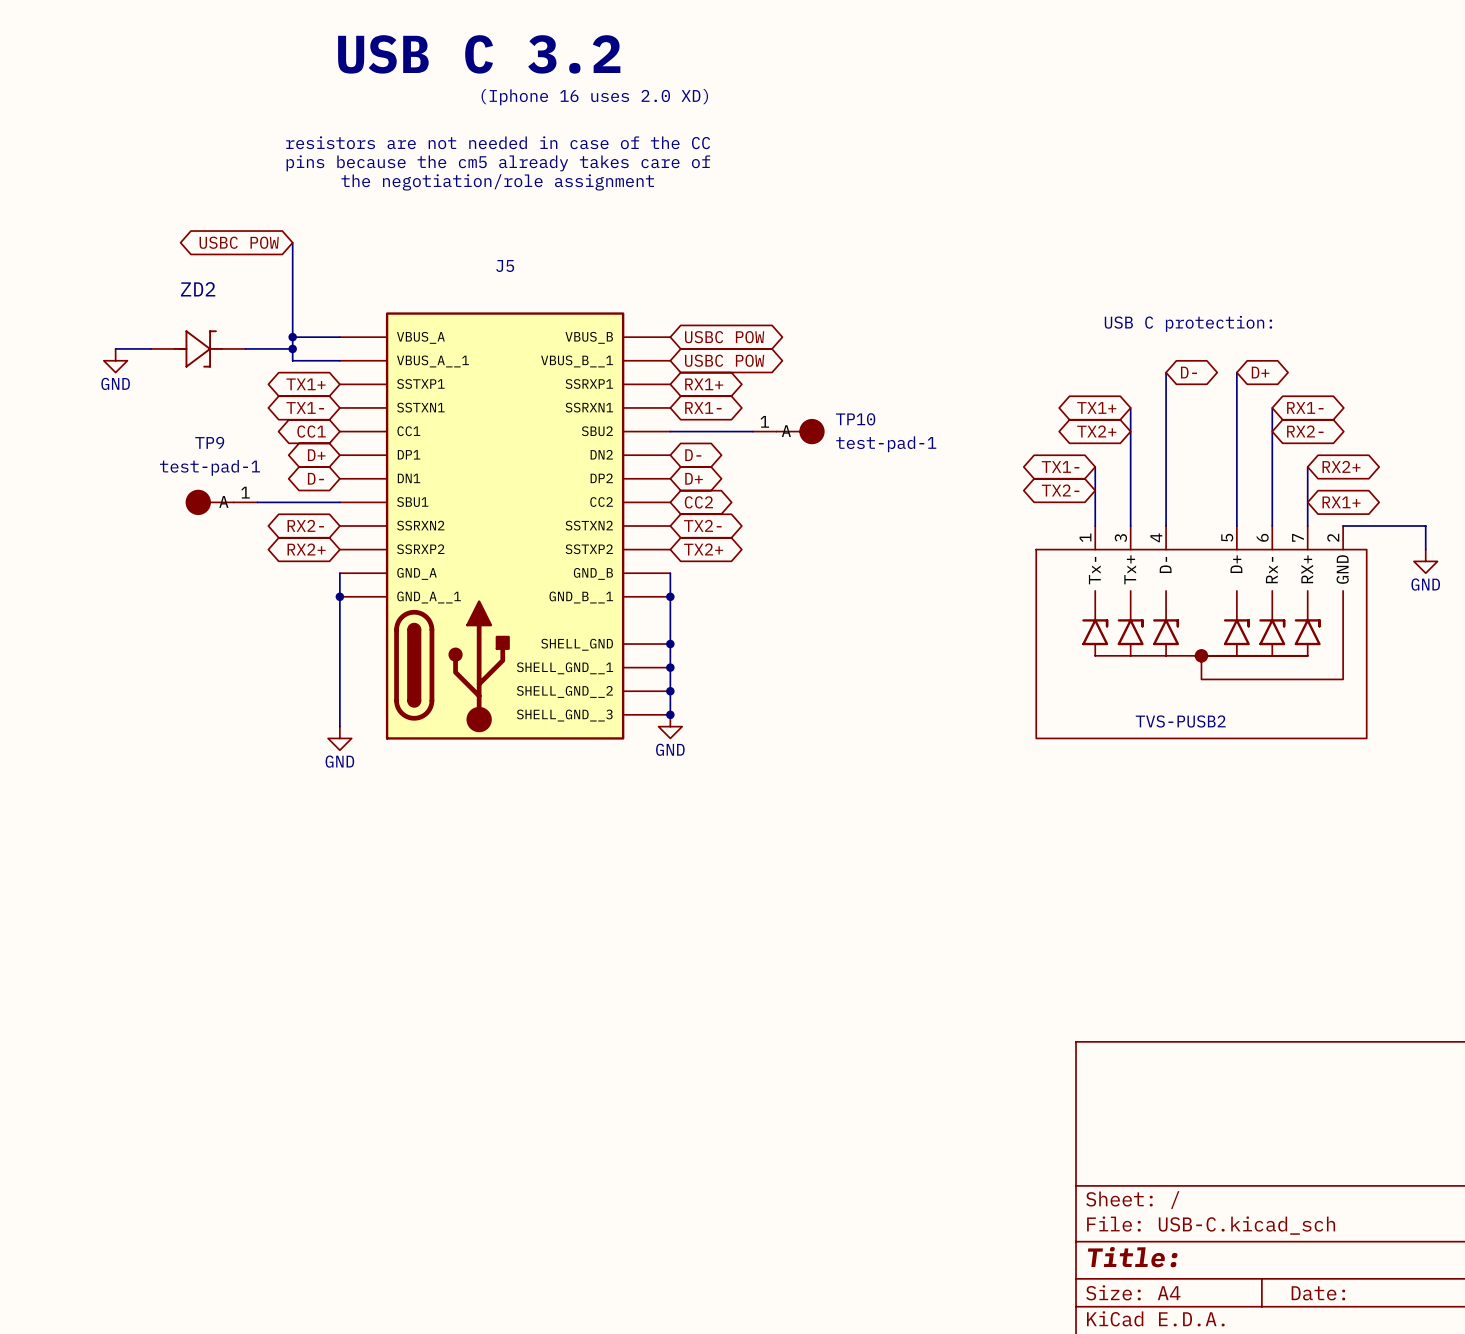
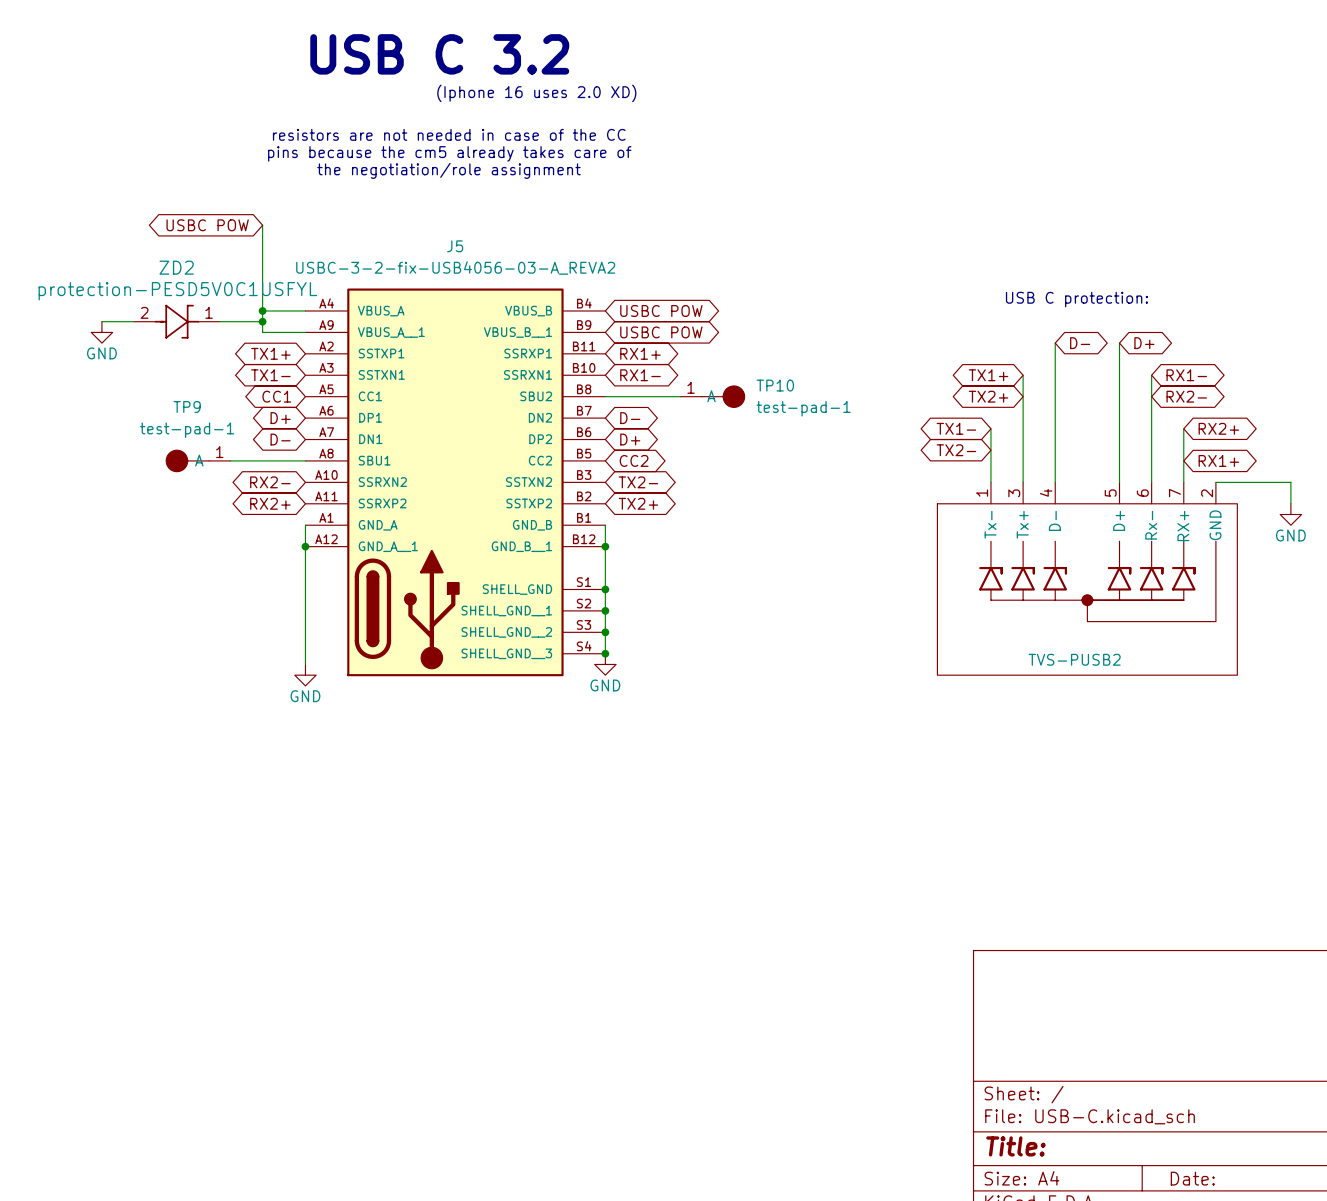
J5 value: none -> USBC-3-2-fix-USB4056-03-A_REVA2 (455, 268)
J5 symbol: [339, 312, 671, 740] -> [305, 288, 606, 677]
ZD2 value: none -> protection-PESD5V0C1USFYL (177, 291)
ZD2 pin number: none -> 2 (144, 312)
ZD2 pin number: none -> 1 (209, 312)

